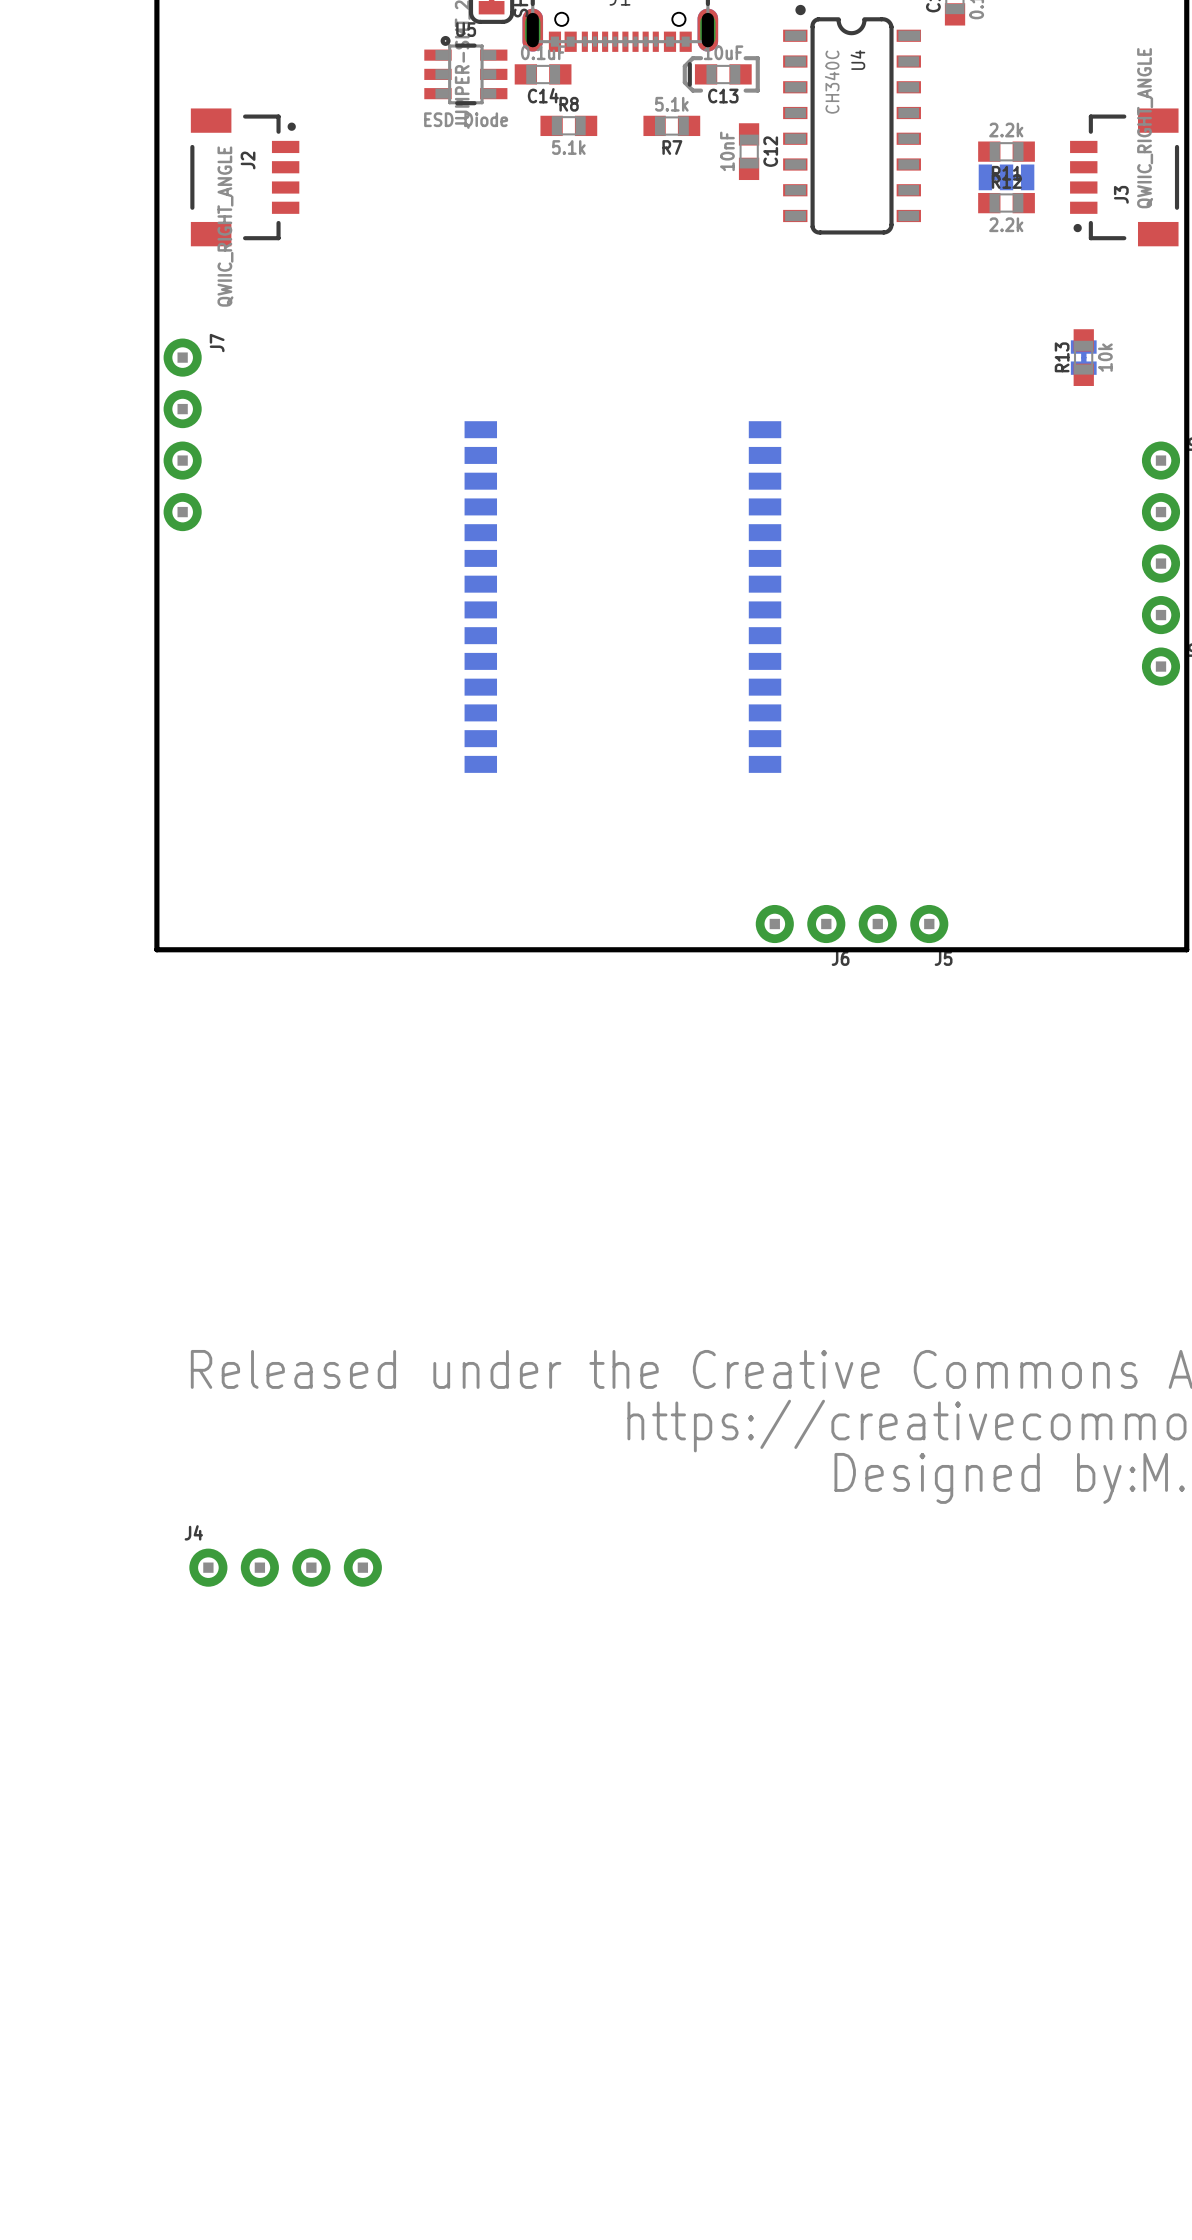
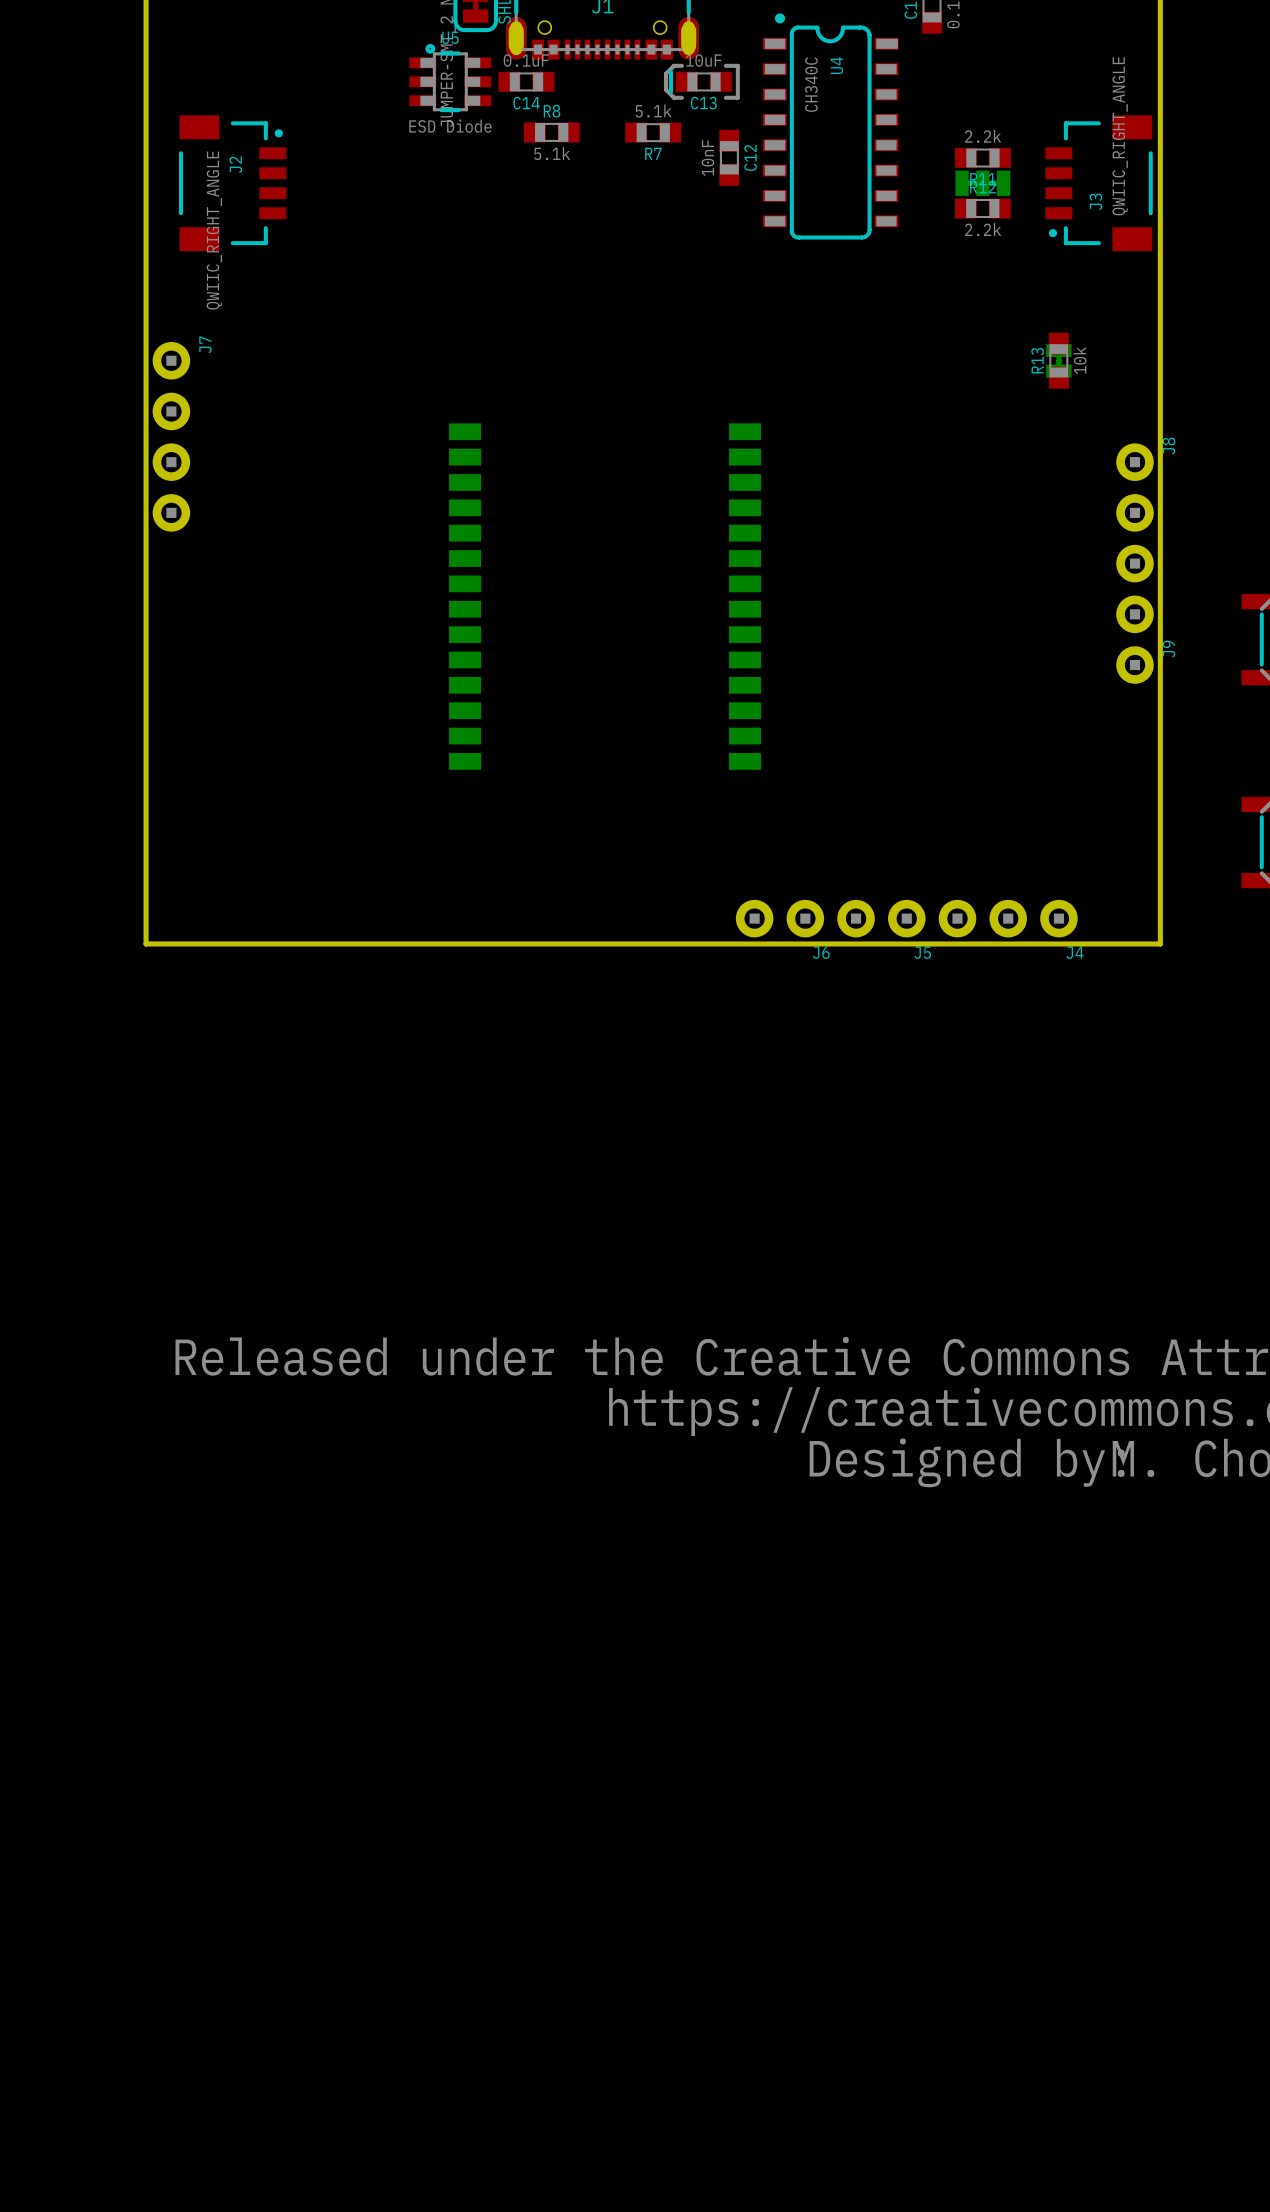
J4 name position: J4 (193, 1532) -> J4 (1075, 952)
J4 footprint: [189, 1548, 382, 1587] -> [938, 899, 1078, 938]

